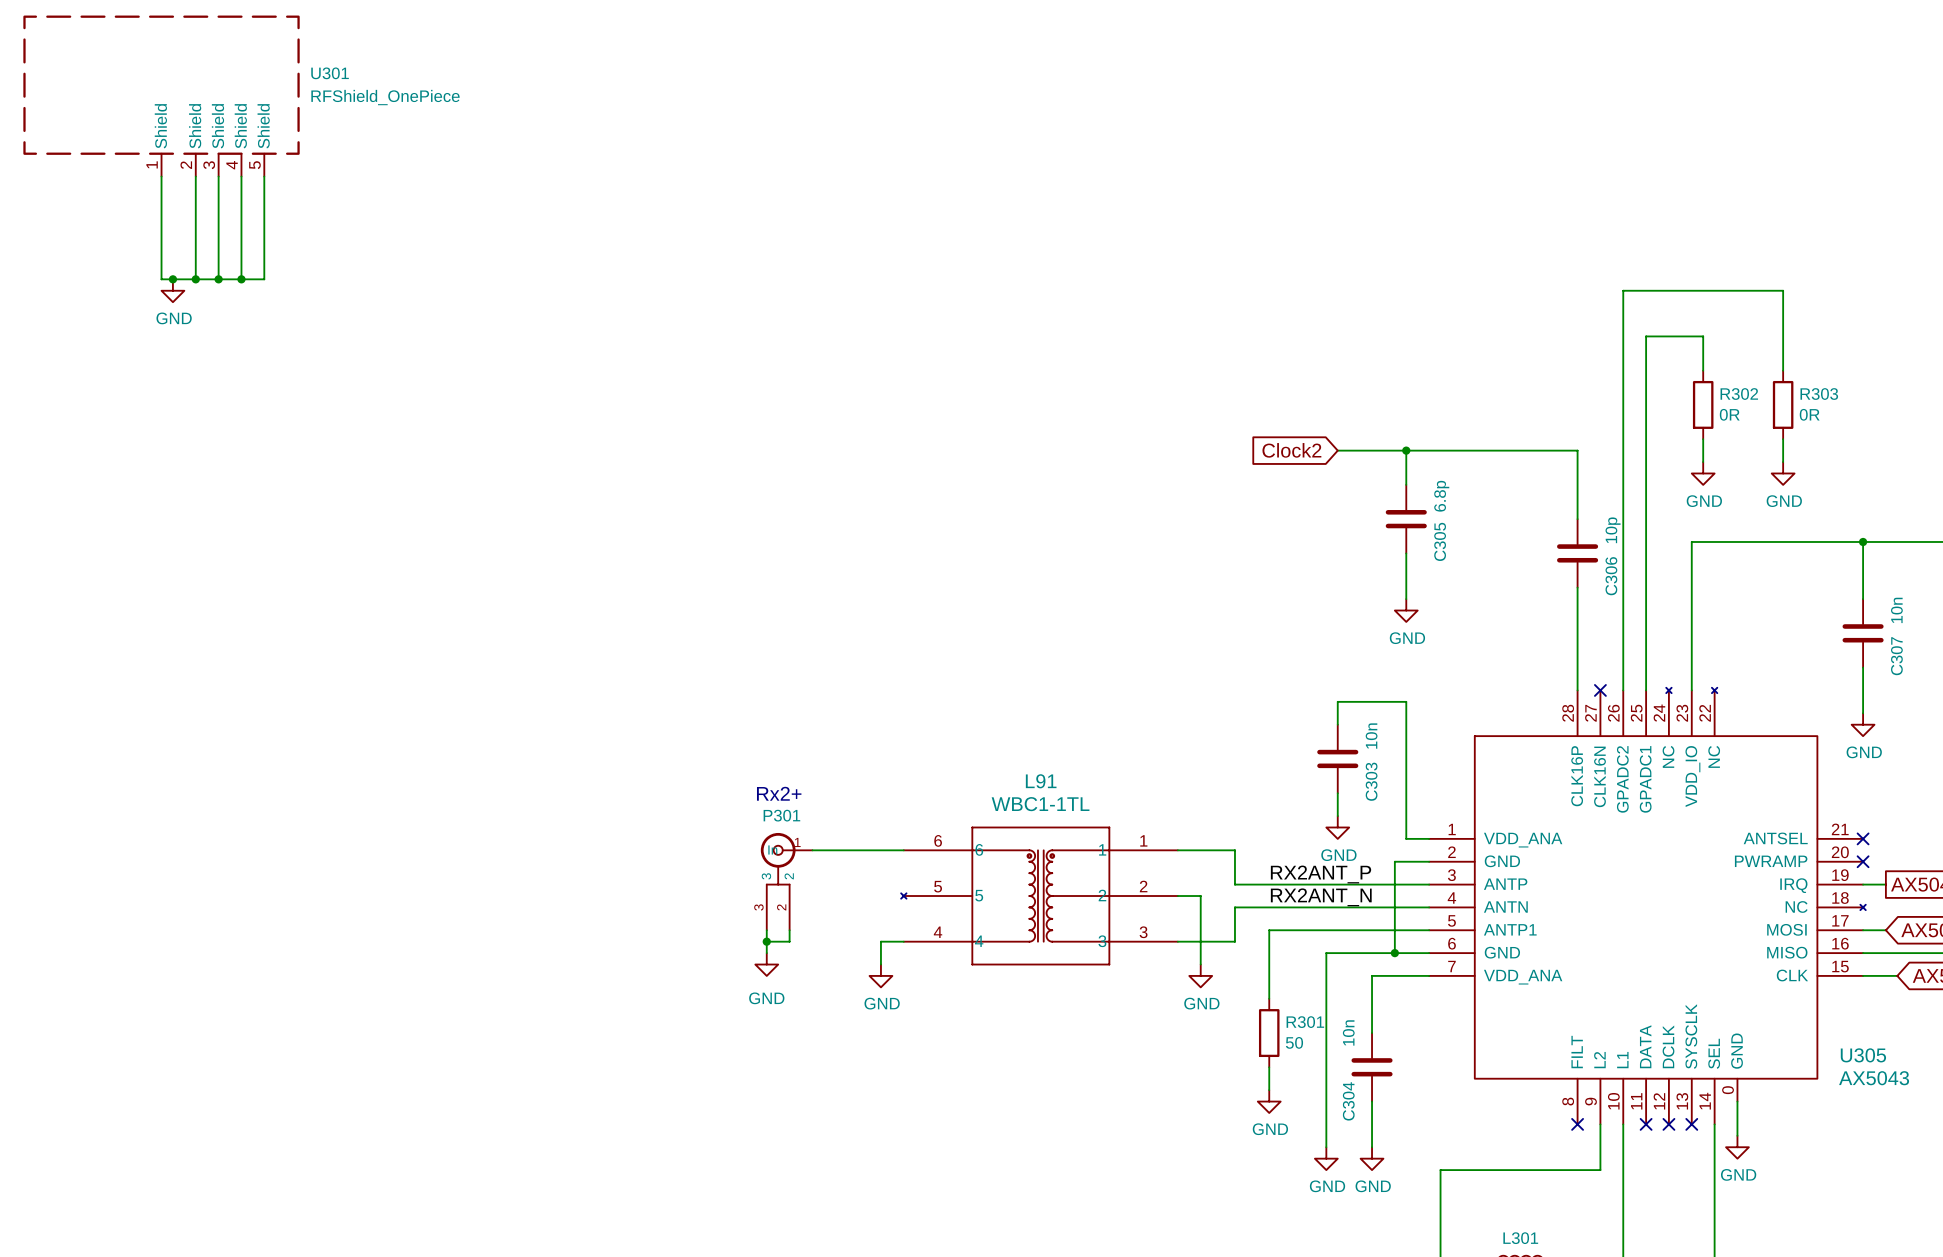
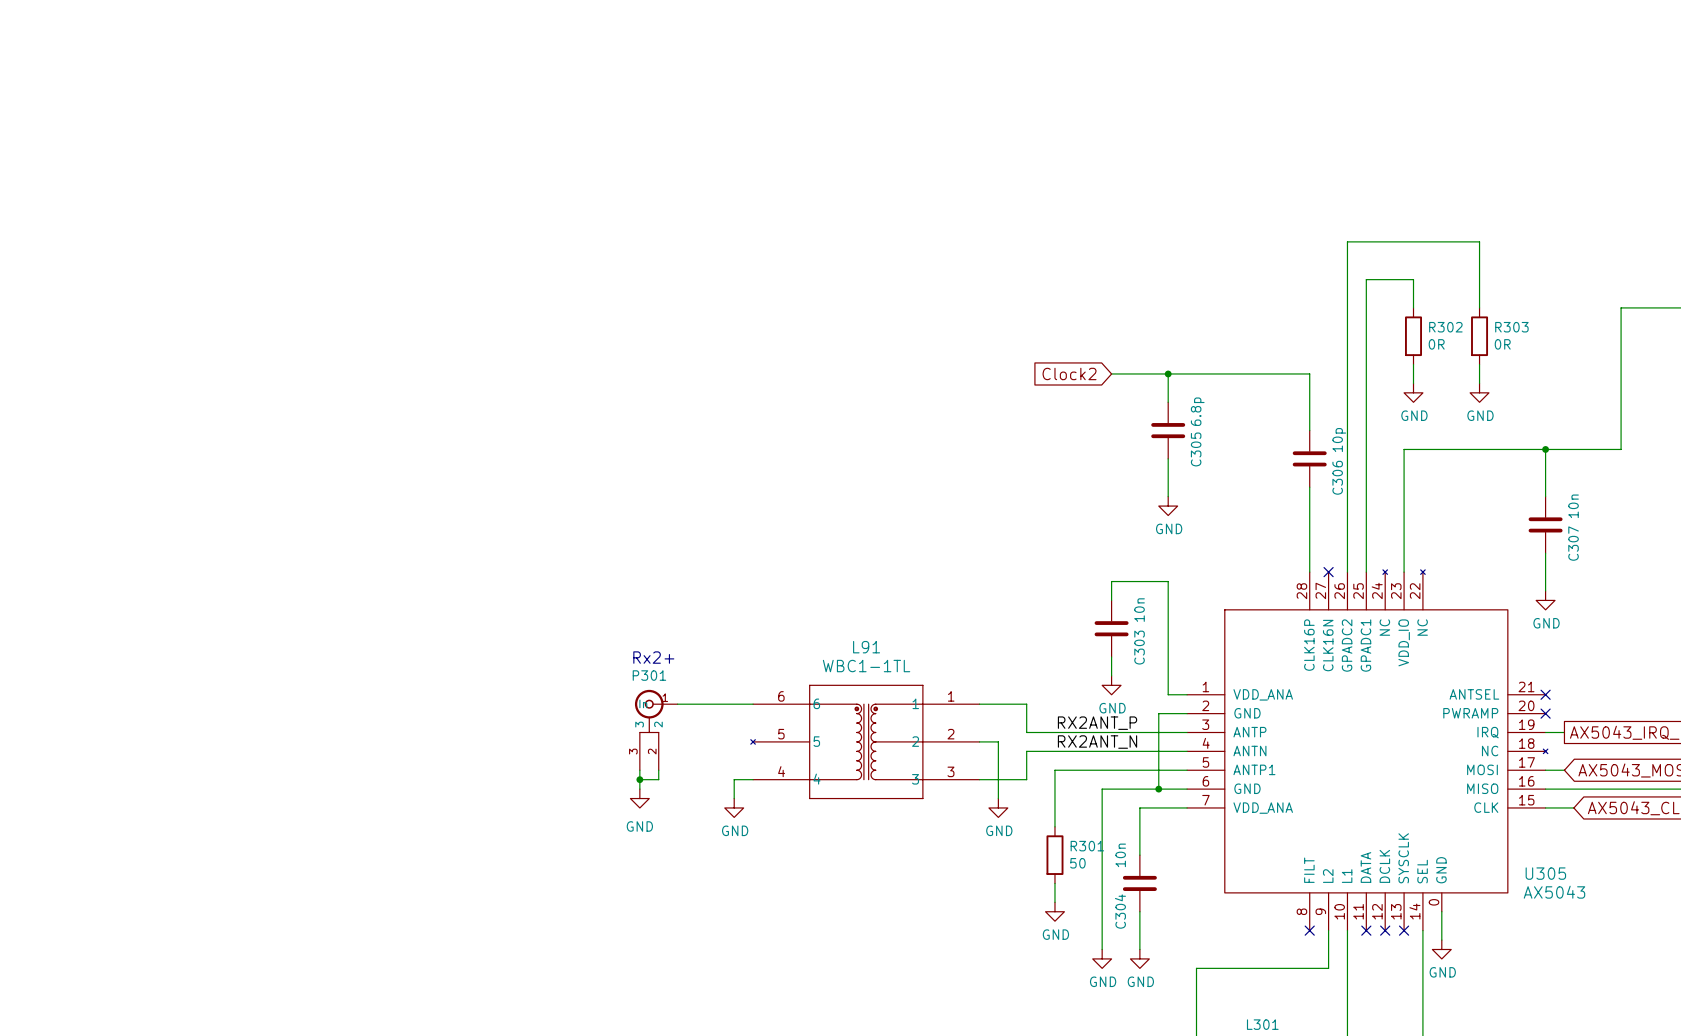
U301: RFShield_OnePiece (161, 96) -> none
wire: (161, 176) (161, 279) (264, 279) (264, 176) -> none
wire: (195, 176) (195, 279) -> none
wire: (218, 176) (218, 279) -> none
wire: (241, 176) (241, 279) -> none
junction: (172, 279) -> none
junction: (195, 279) -> none
junction: (218, 279) -> none
junction: (241, 279) -> none
power symbol: GND (172, 290) -> none

